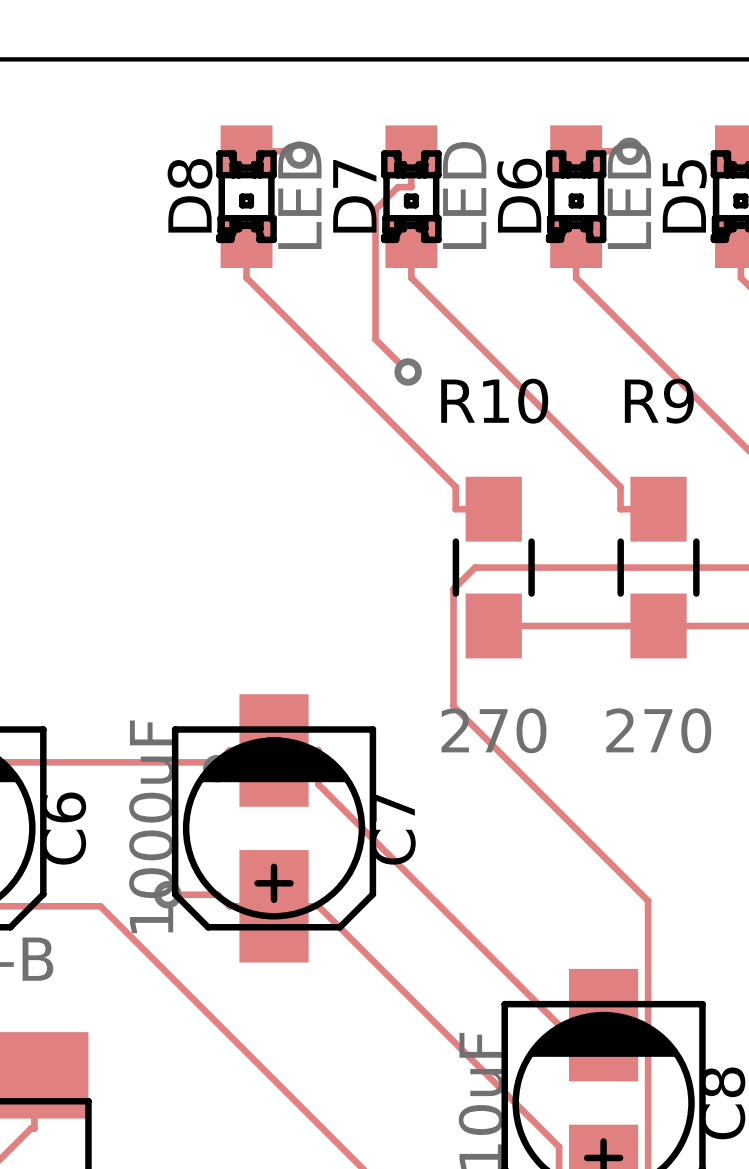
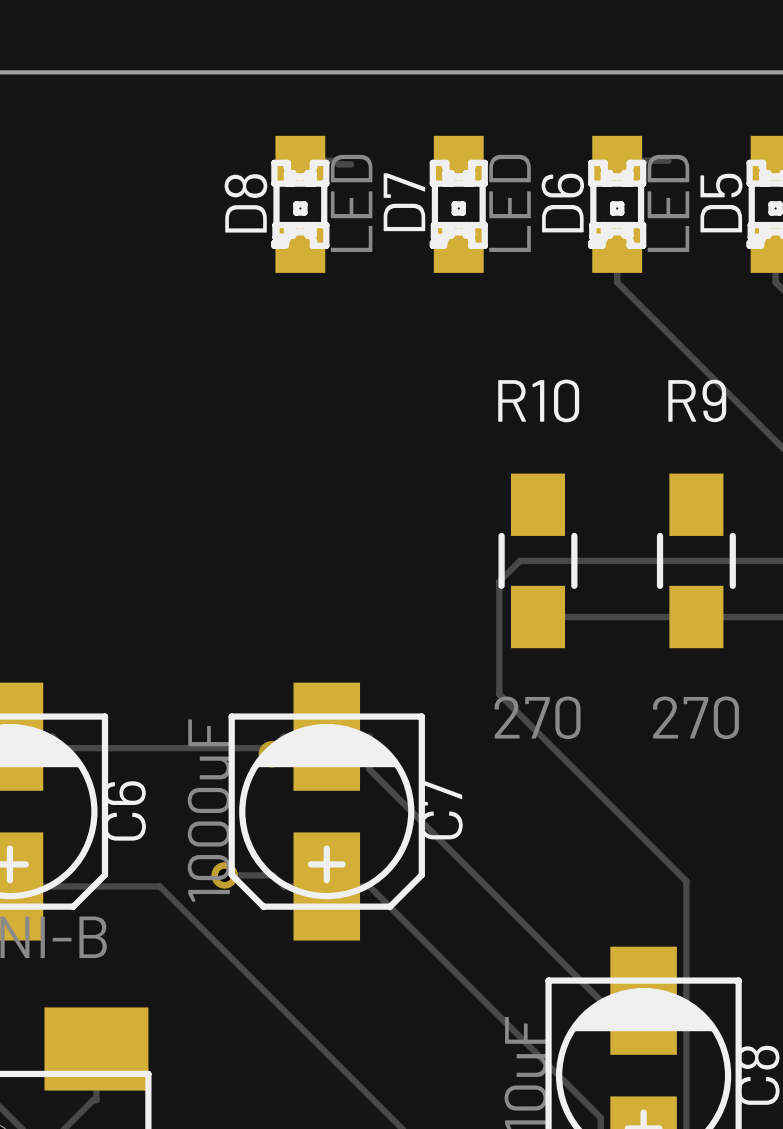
track: (411, 151) (411, 187) (397, 187) (375, 209) (375, 339) (408, 371) -> none
via: (629, 151) -> none
via: (299, 155) -> none
track: (246, 242) (246, 277) (455, 487) (455, 509) (493, 509) -> none
track: (411, 242) (411, 277) (620, 487) (620, 509) (658, 509) -> none
via: (408, 371) -> none

